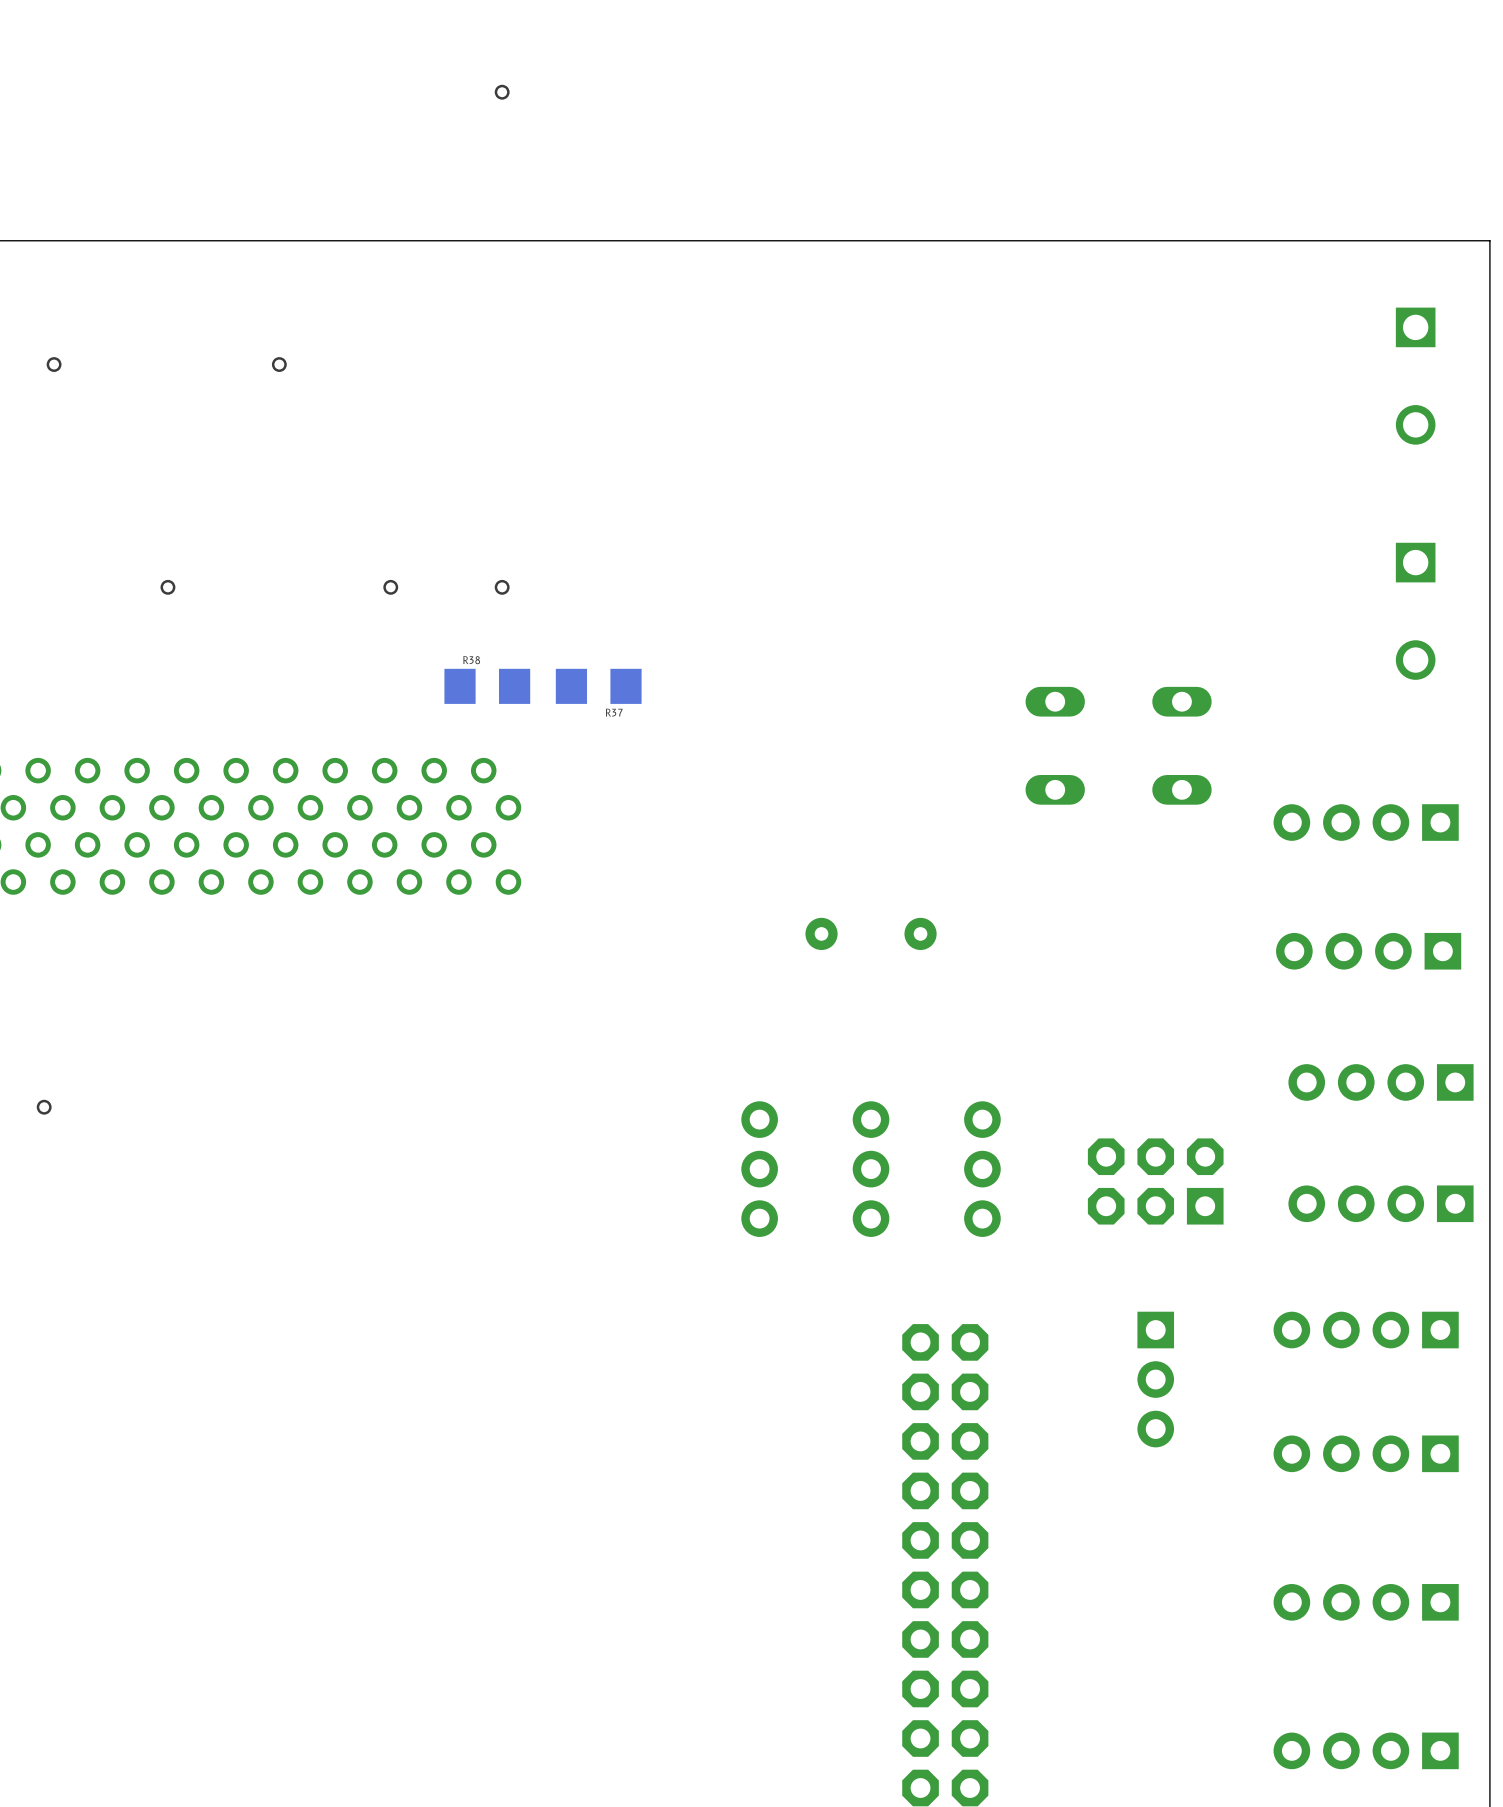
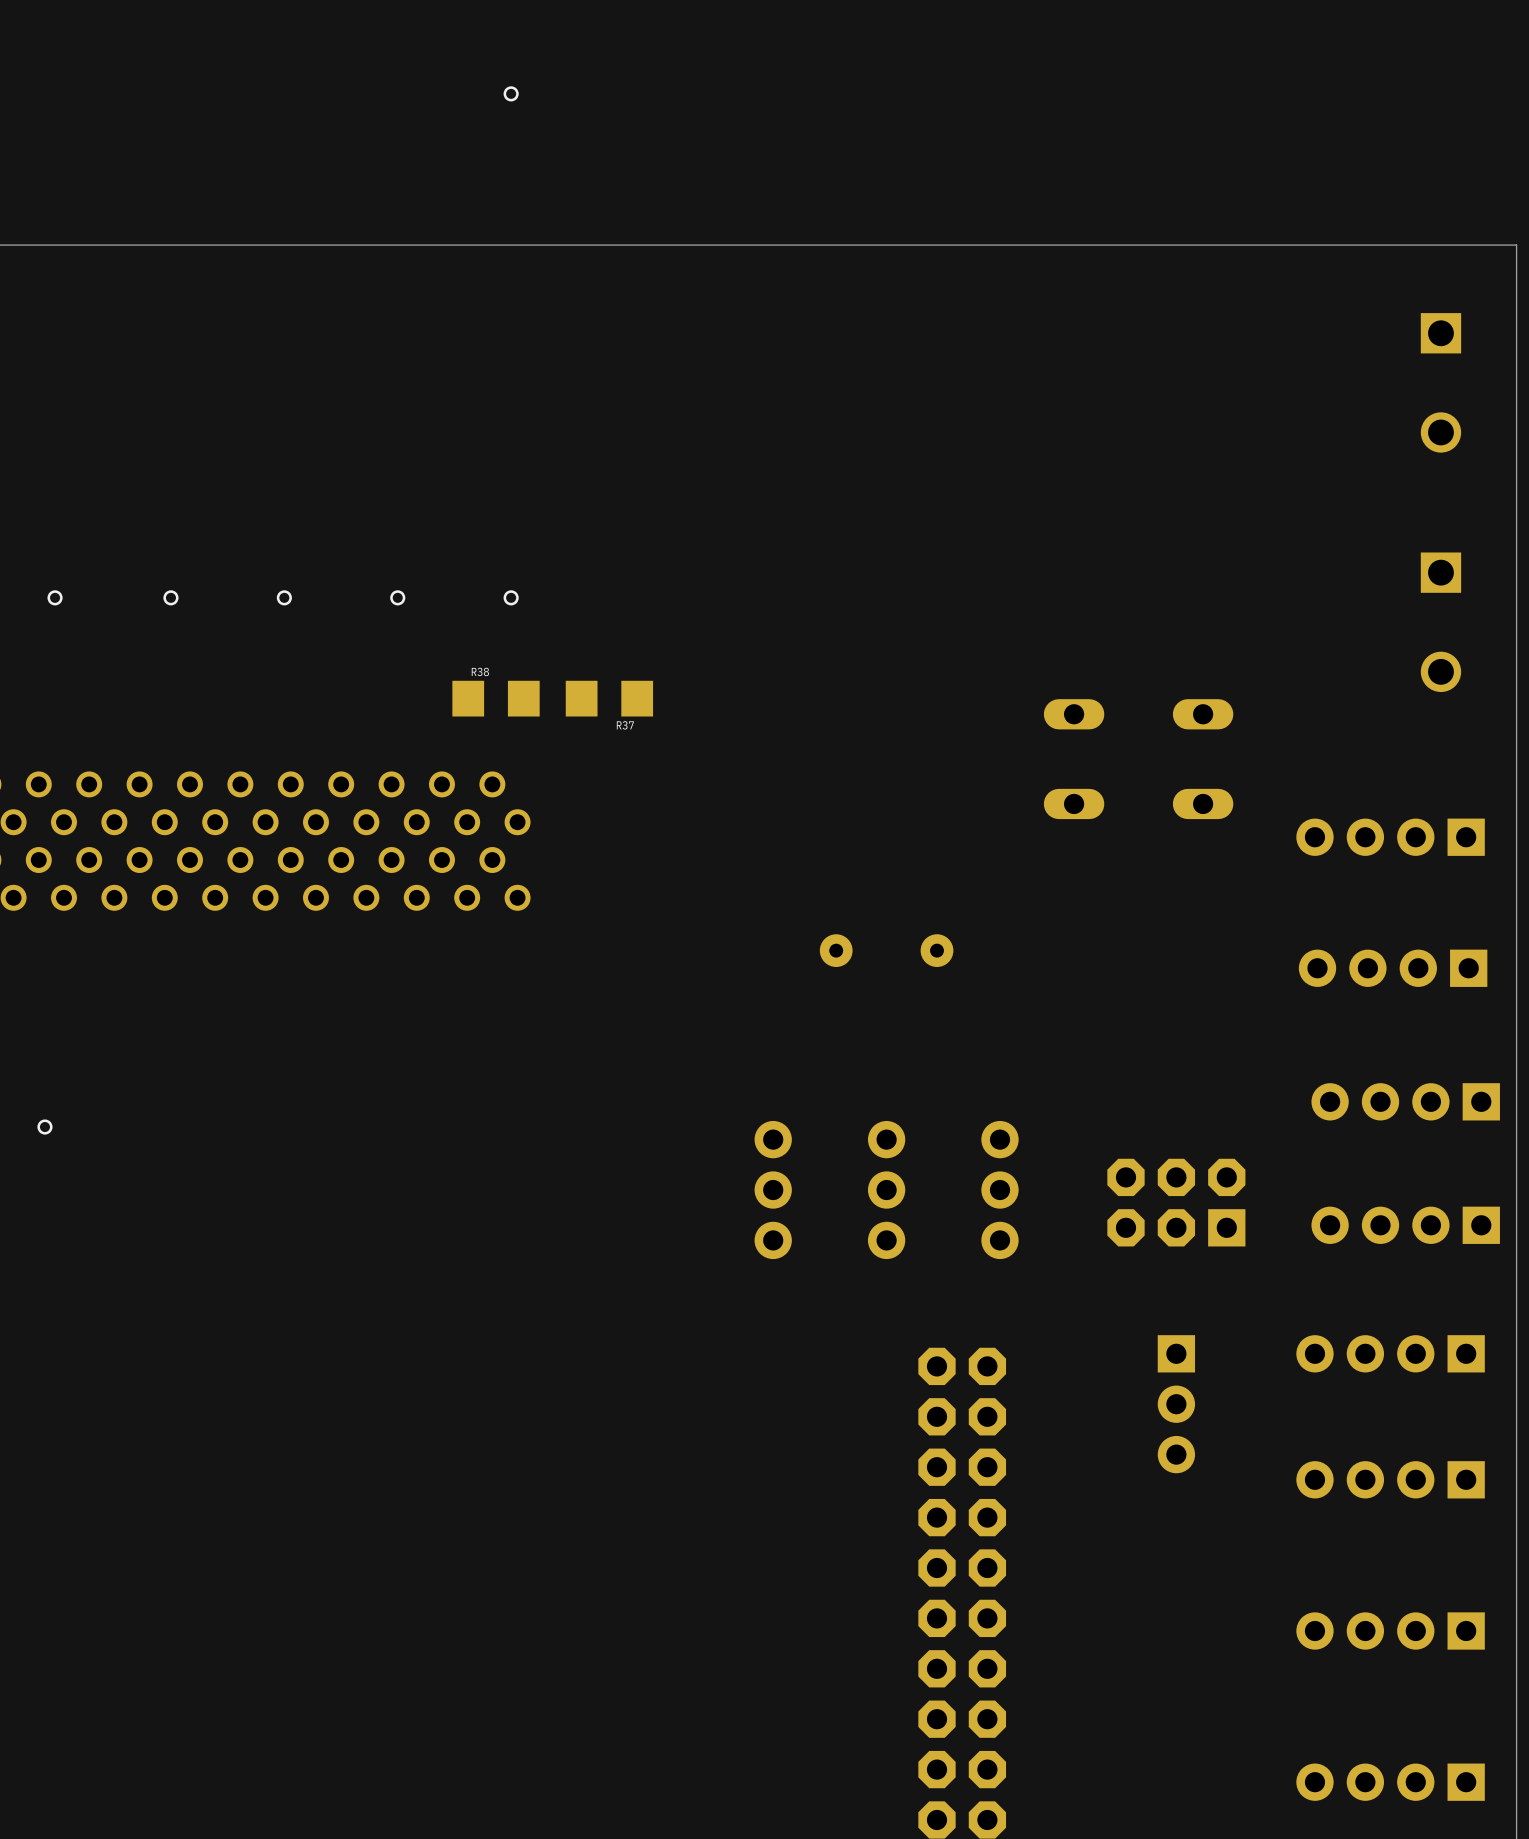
part: (54, 364) -> none
part: (279, 364) -> none
part: none -> (55, 597)
part: none -> (284, 597)

